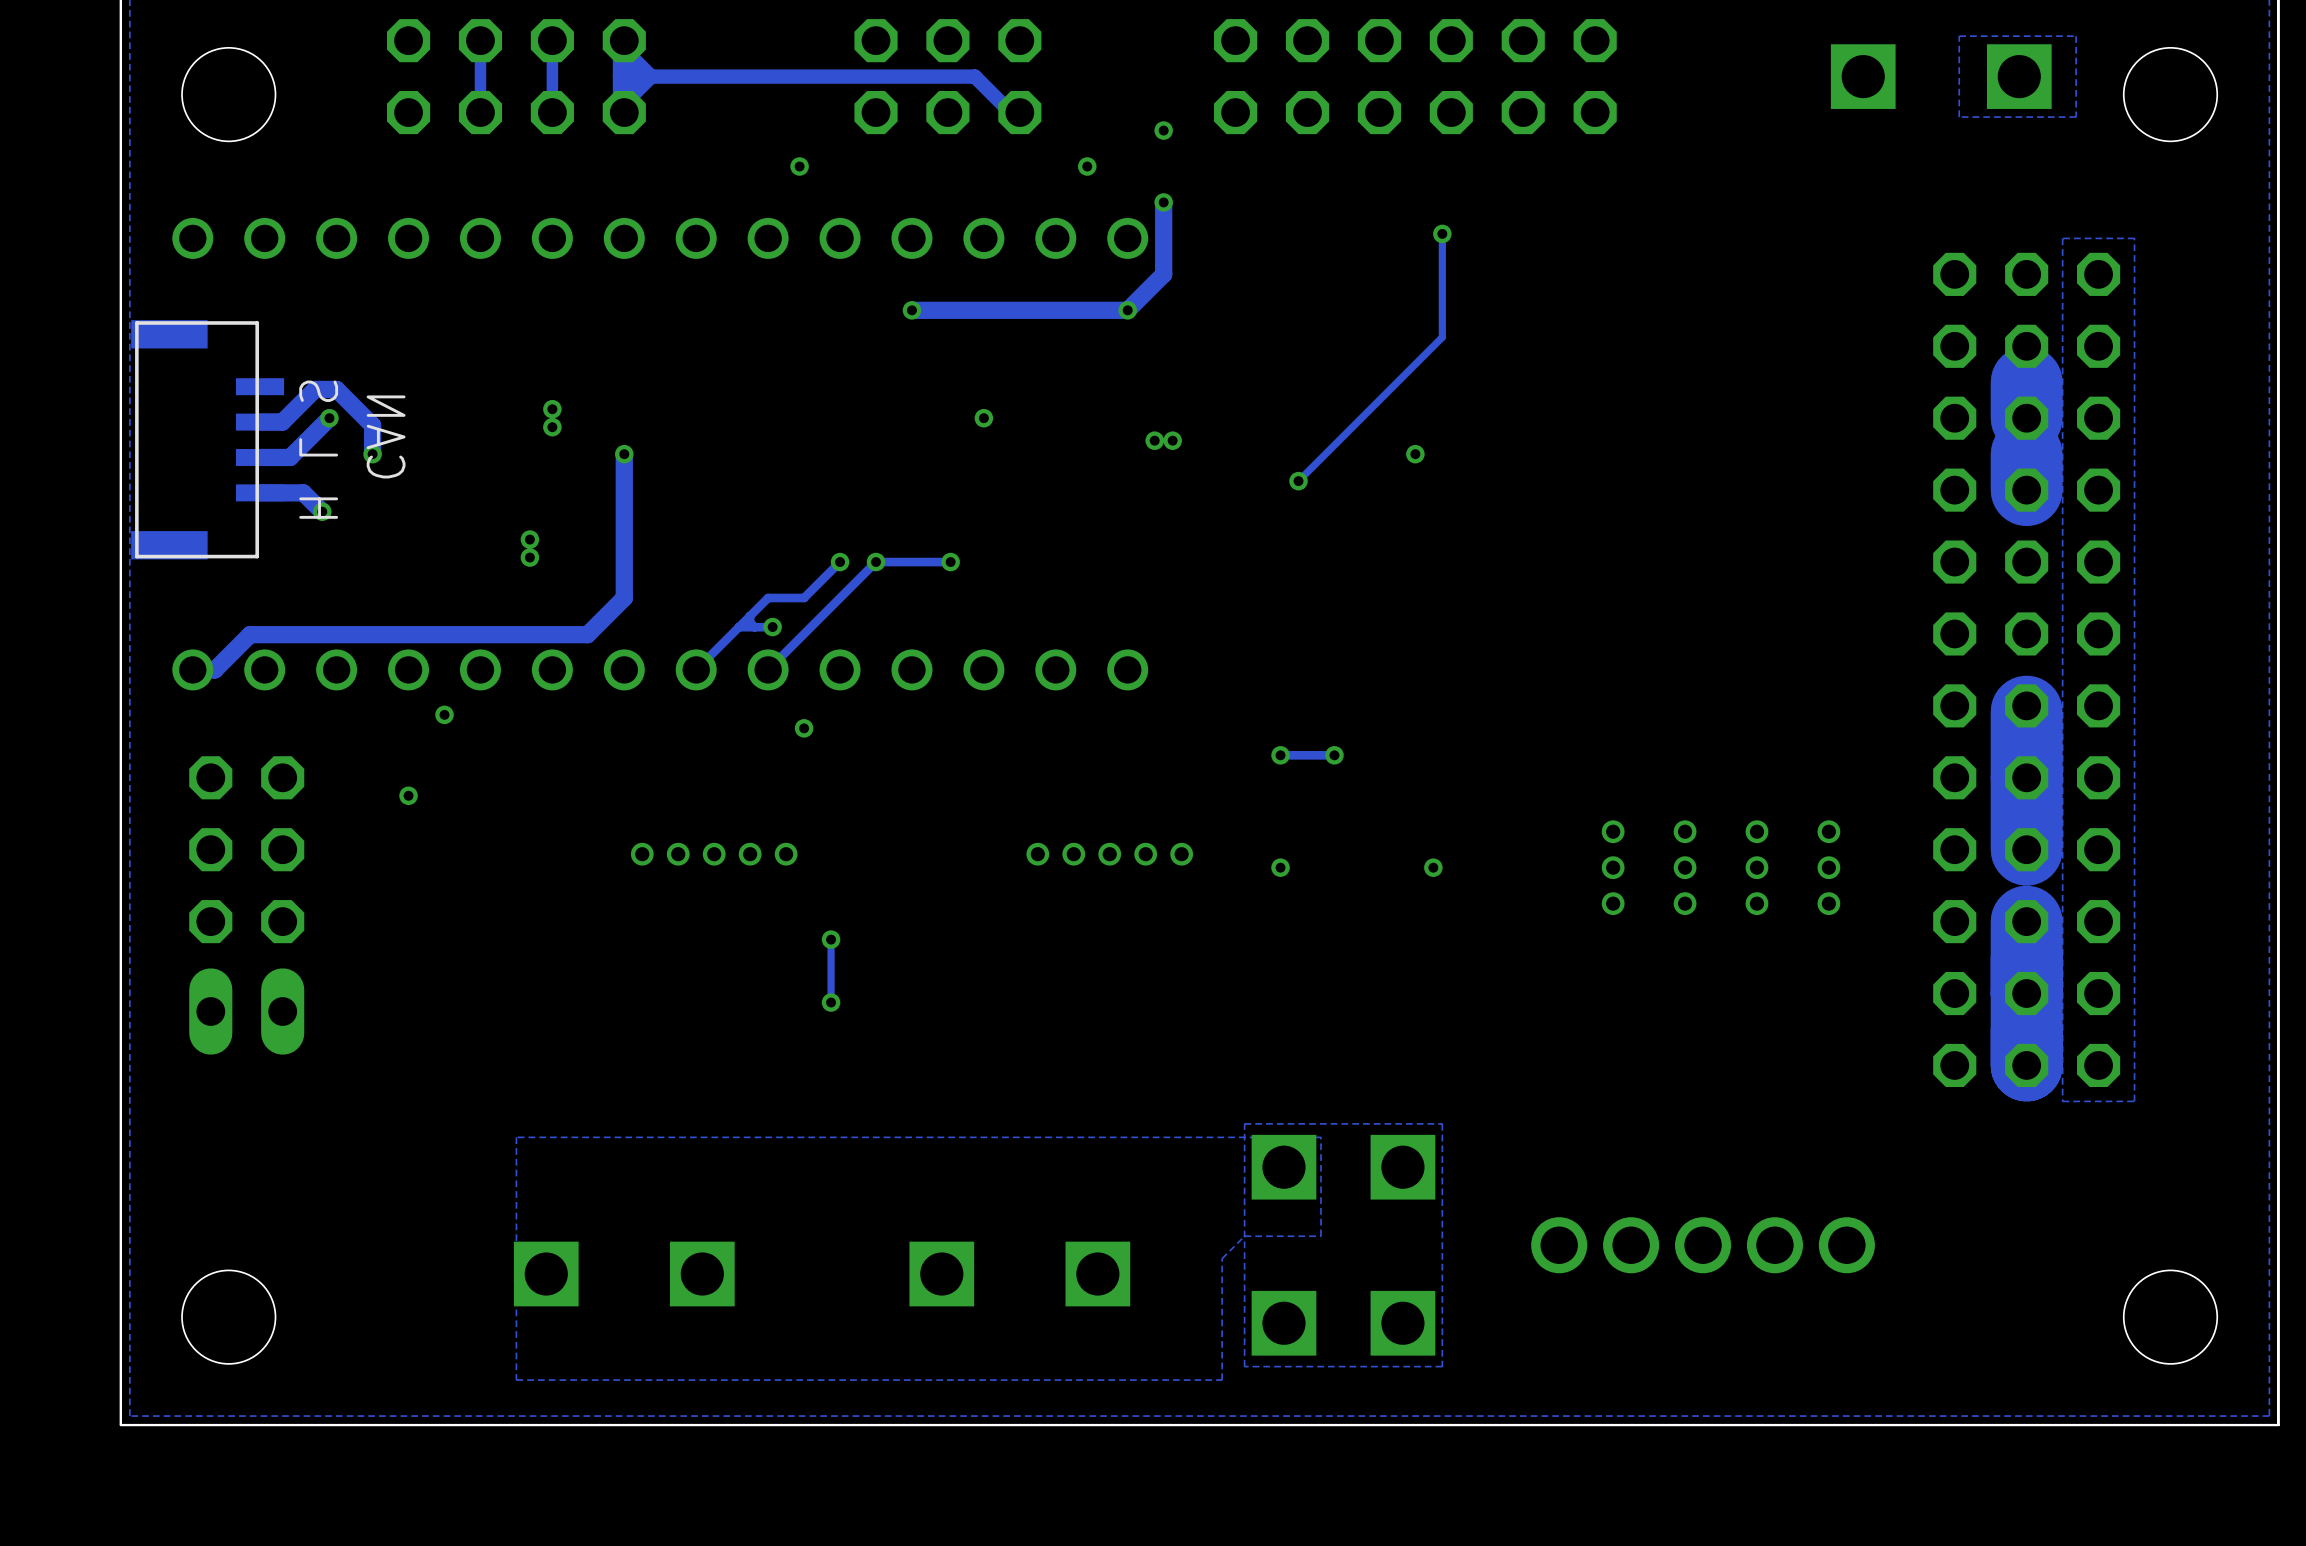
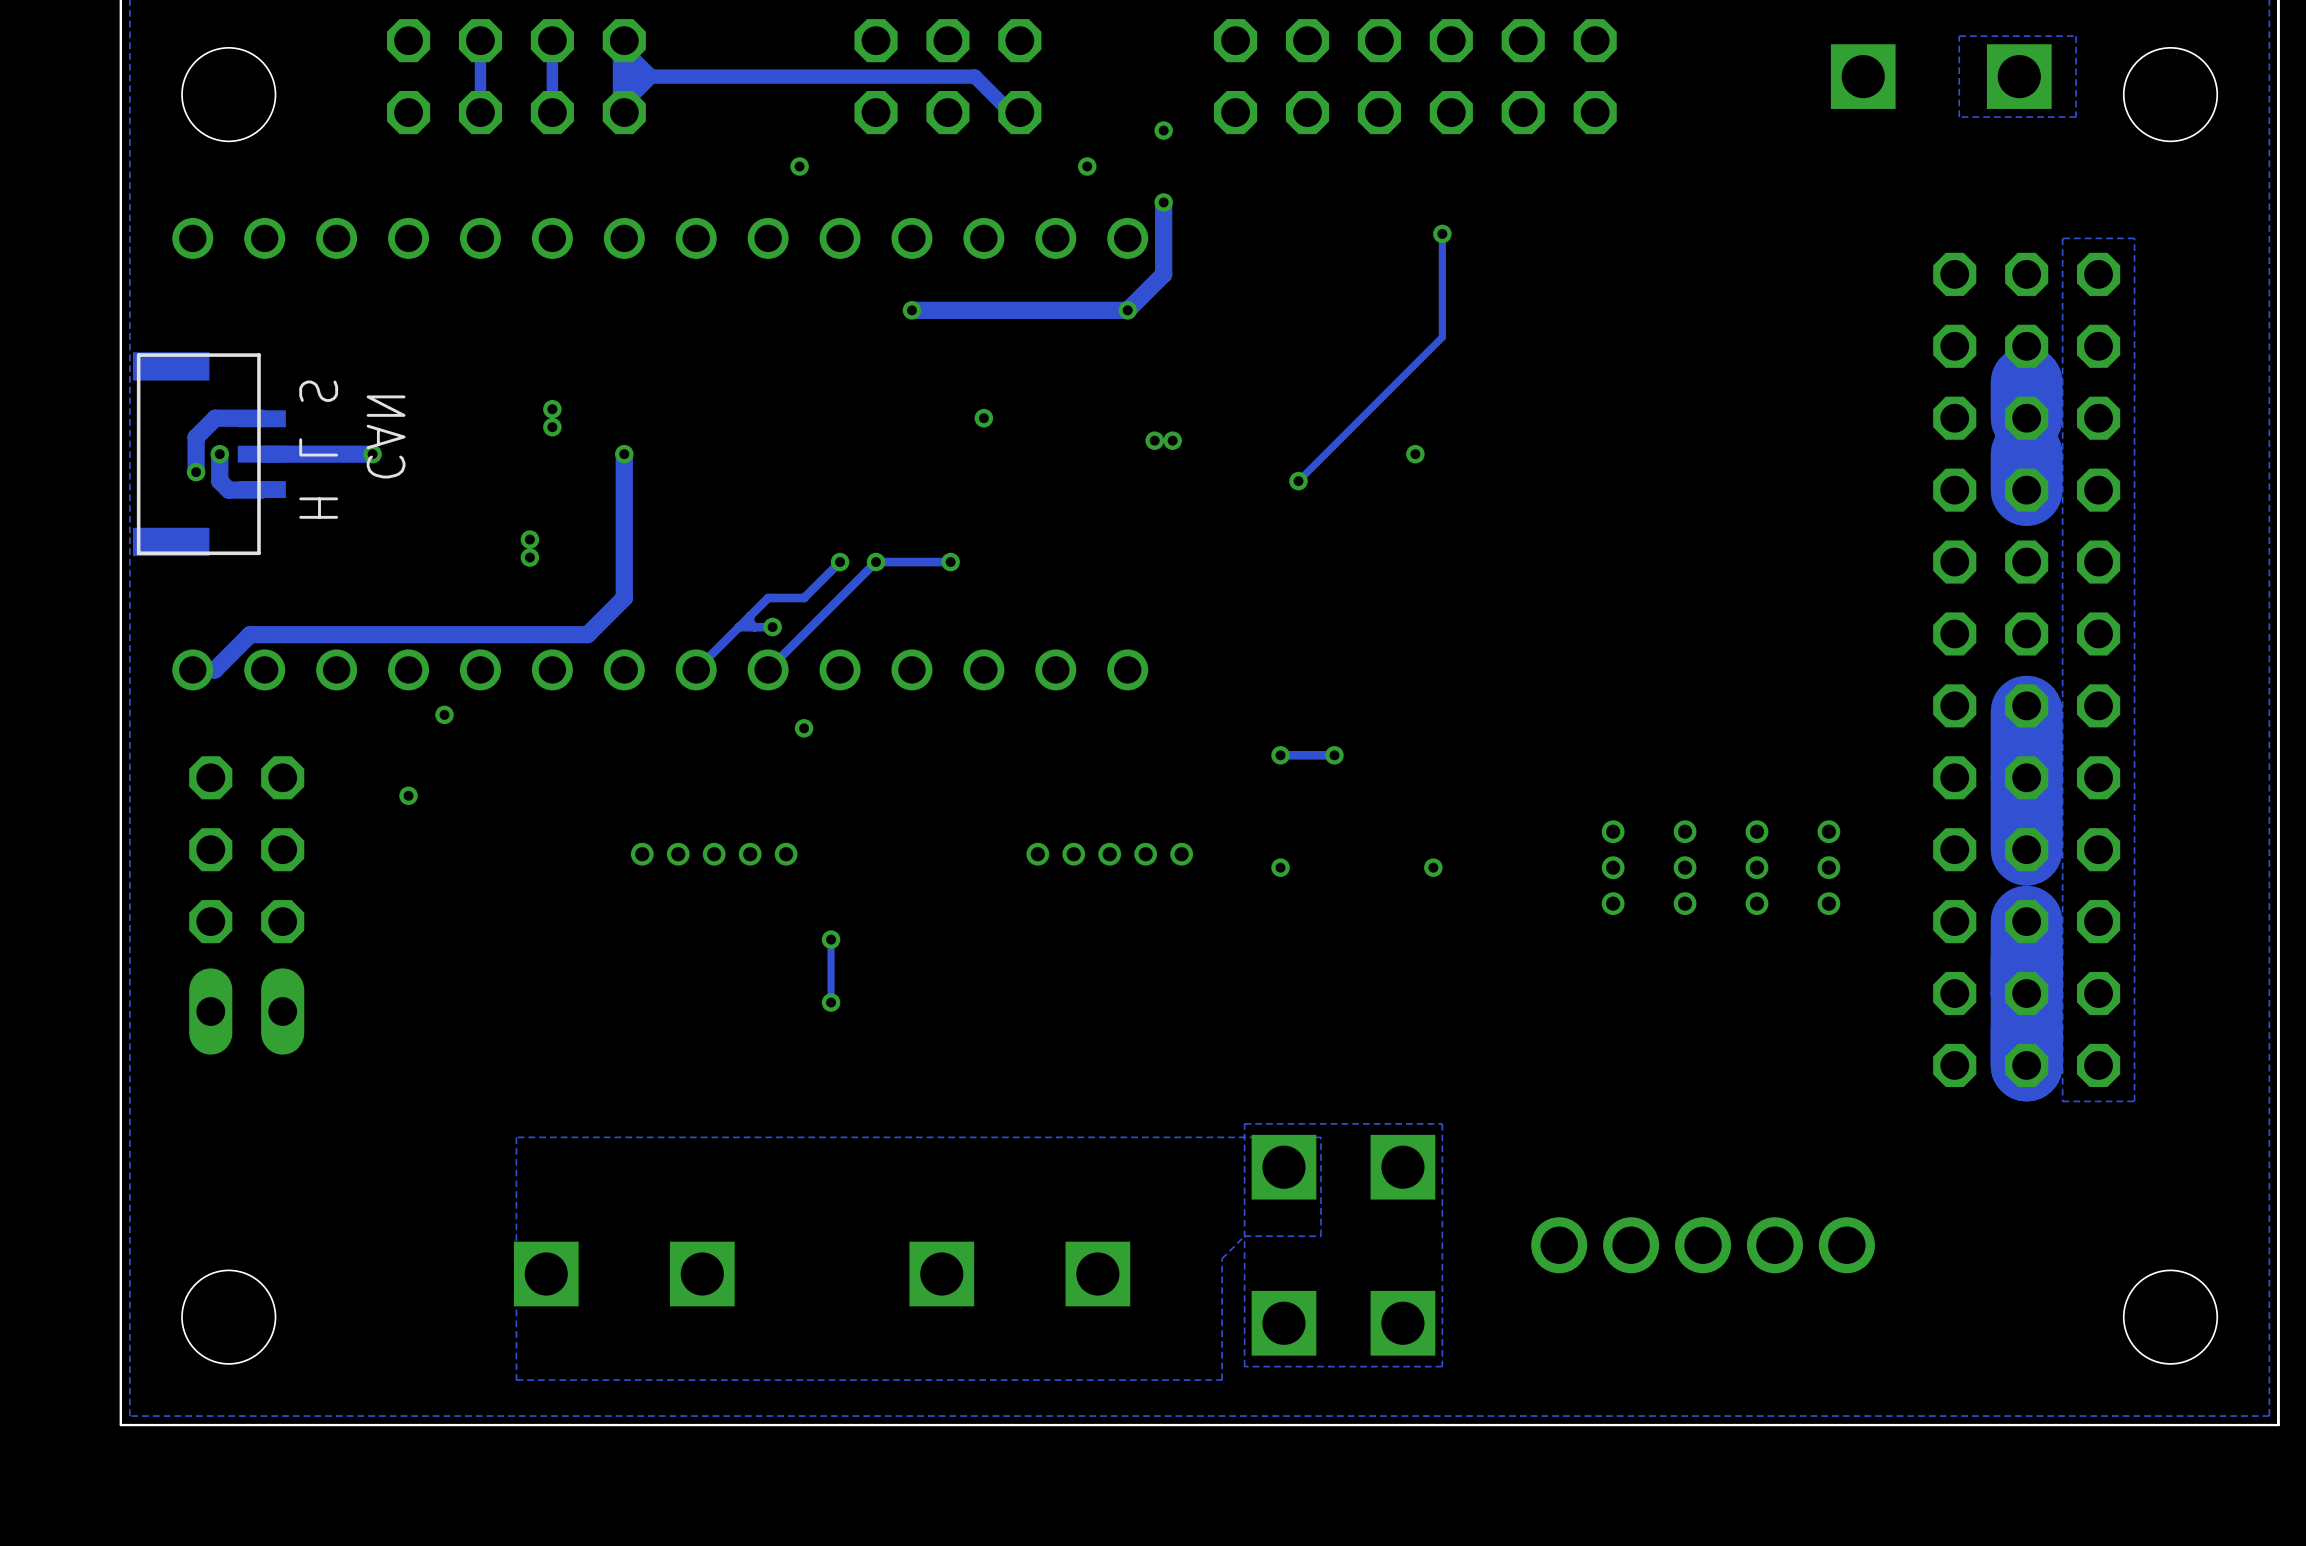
part footprint: [131, 320, 285, 560] -> [132, 352, 286, 557]
track: none -> (261, 418) (215, 418) (196, 437) (196, 472)
track: (329, 418) (290, 457) (260, 457) -> none
via: (329, 418) -> none
track: (260, 422) (282, 422) (315, 389) (336, 389) (372, 425) (372, 454) -> (261, 454) (372, 454)
track: none -> (219, 454) (219, 481) (228, 490) (261, 489)
via: none -> (219, 454)
via: none -> (196, 472)
track: (260, 492) (303, 492) (322, 511) -> none
via: (322, 511) -> none

